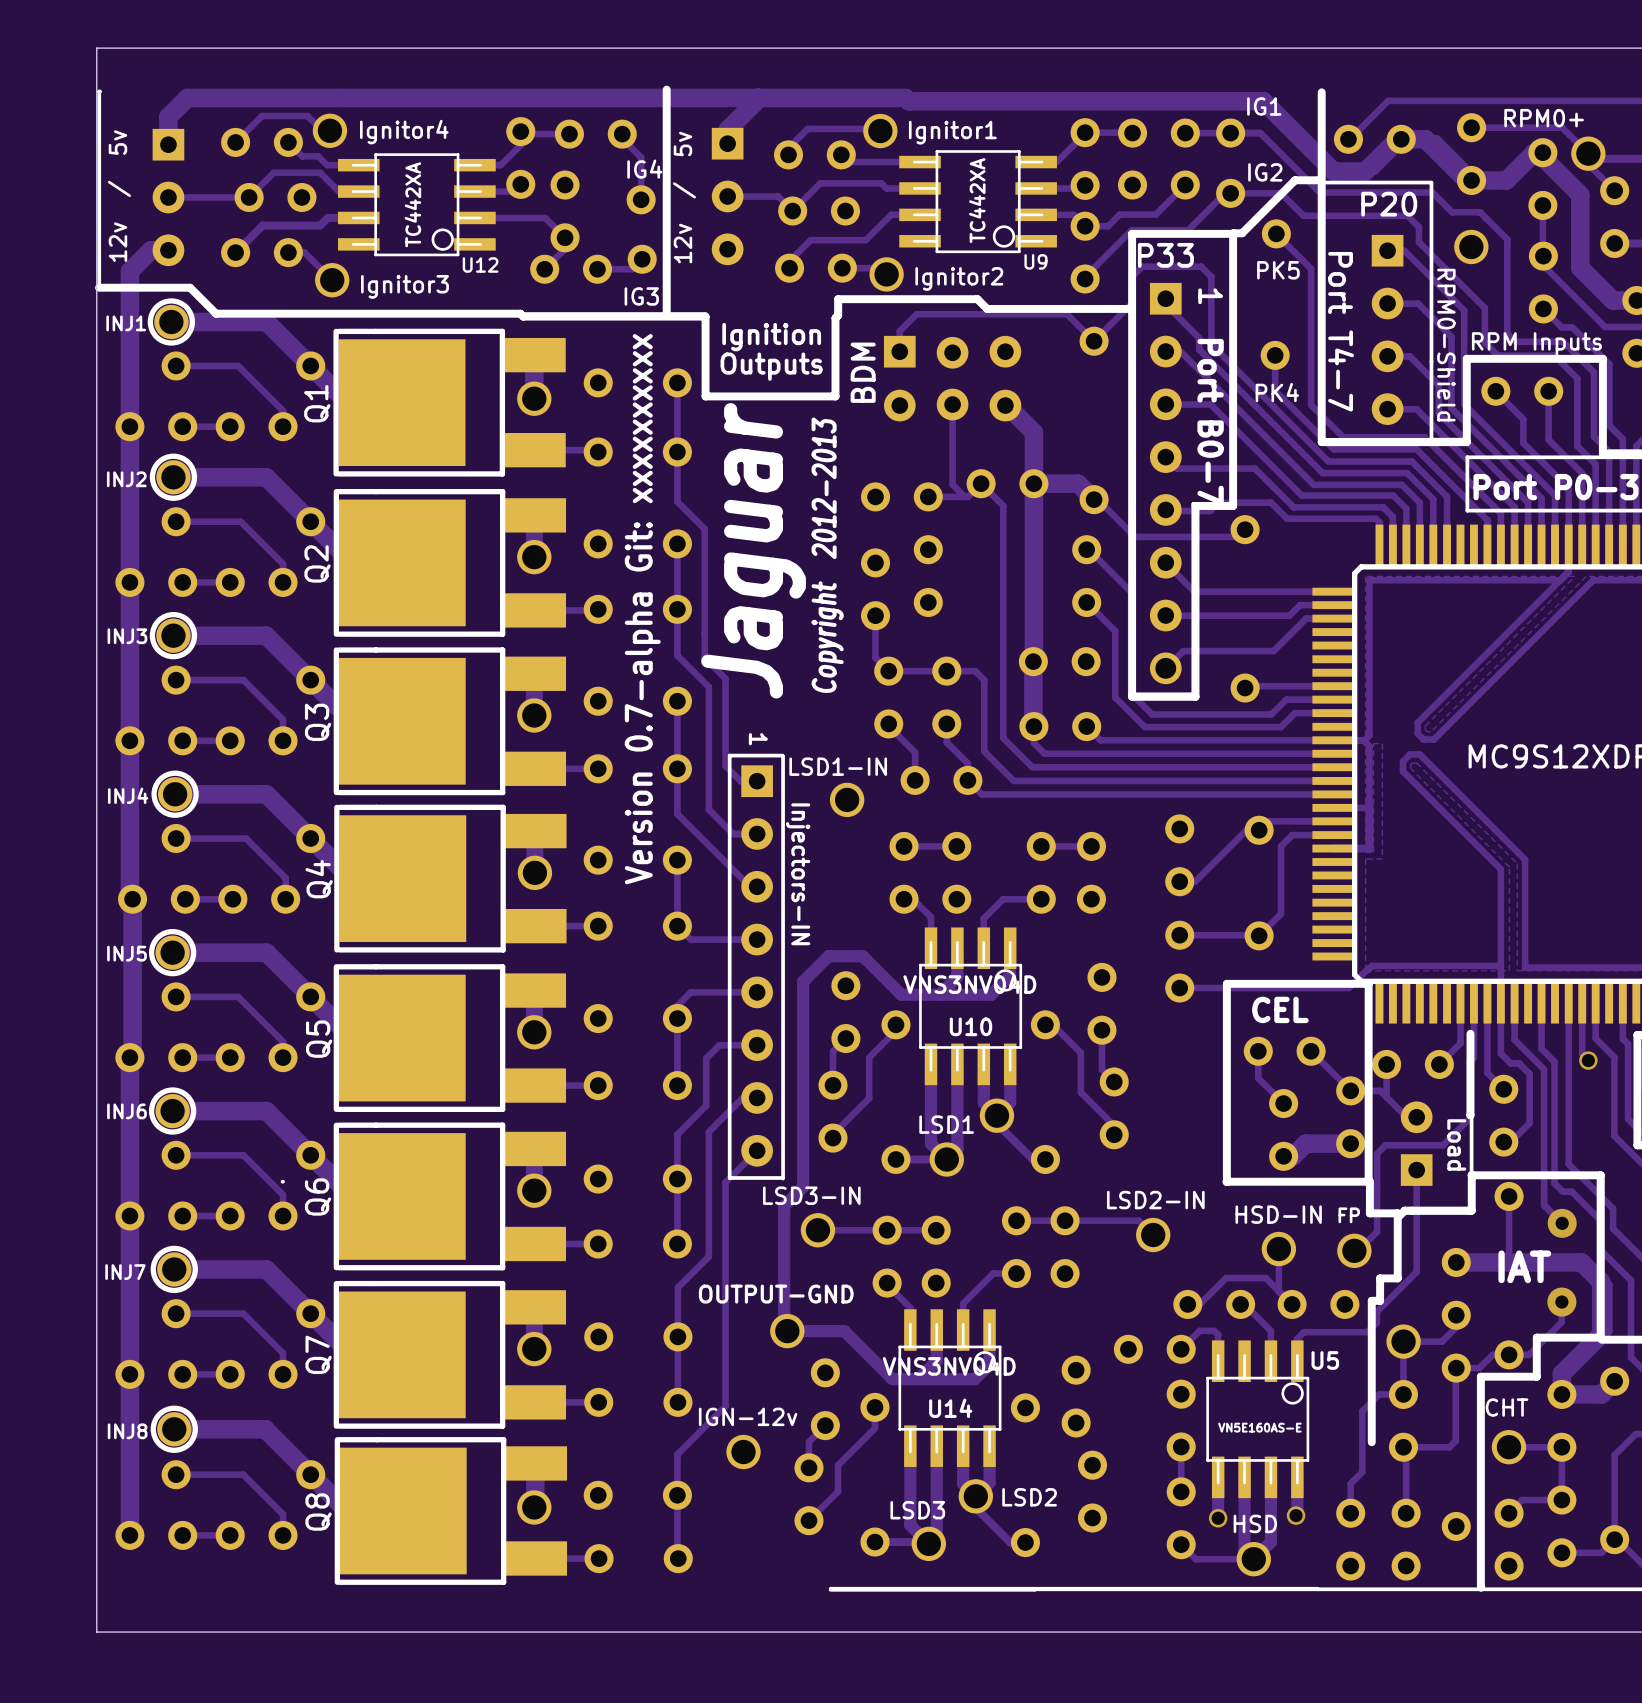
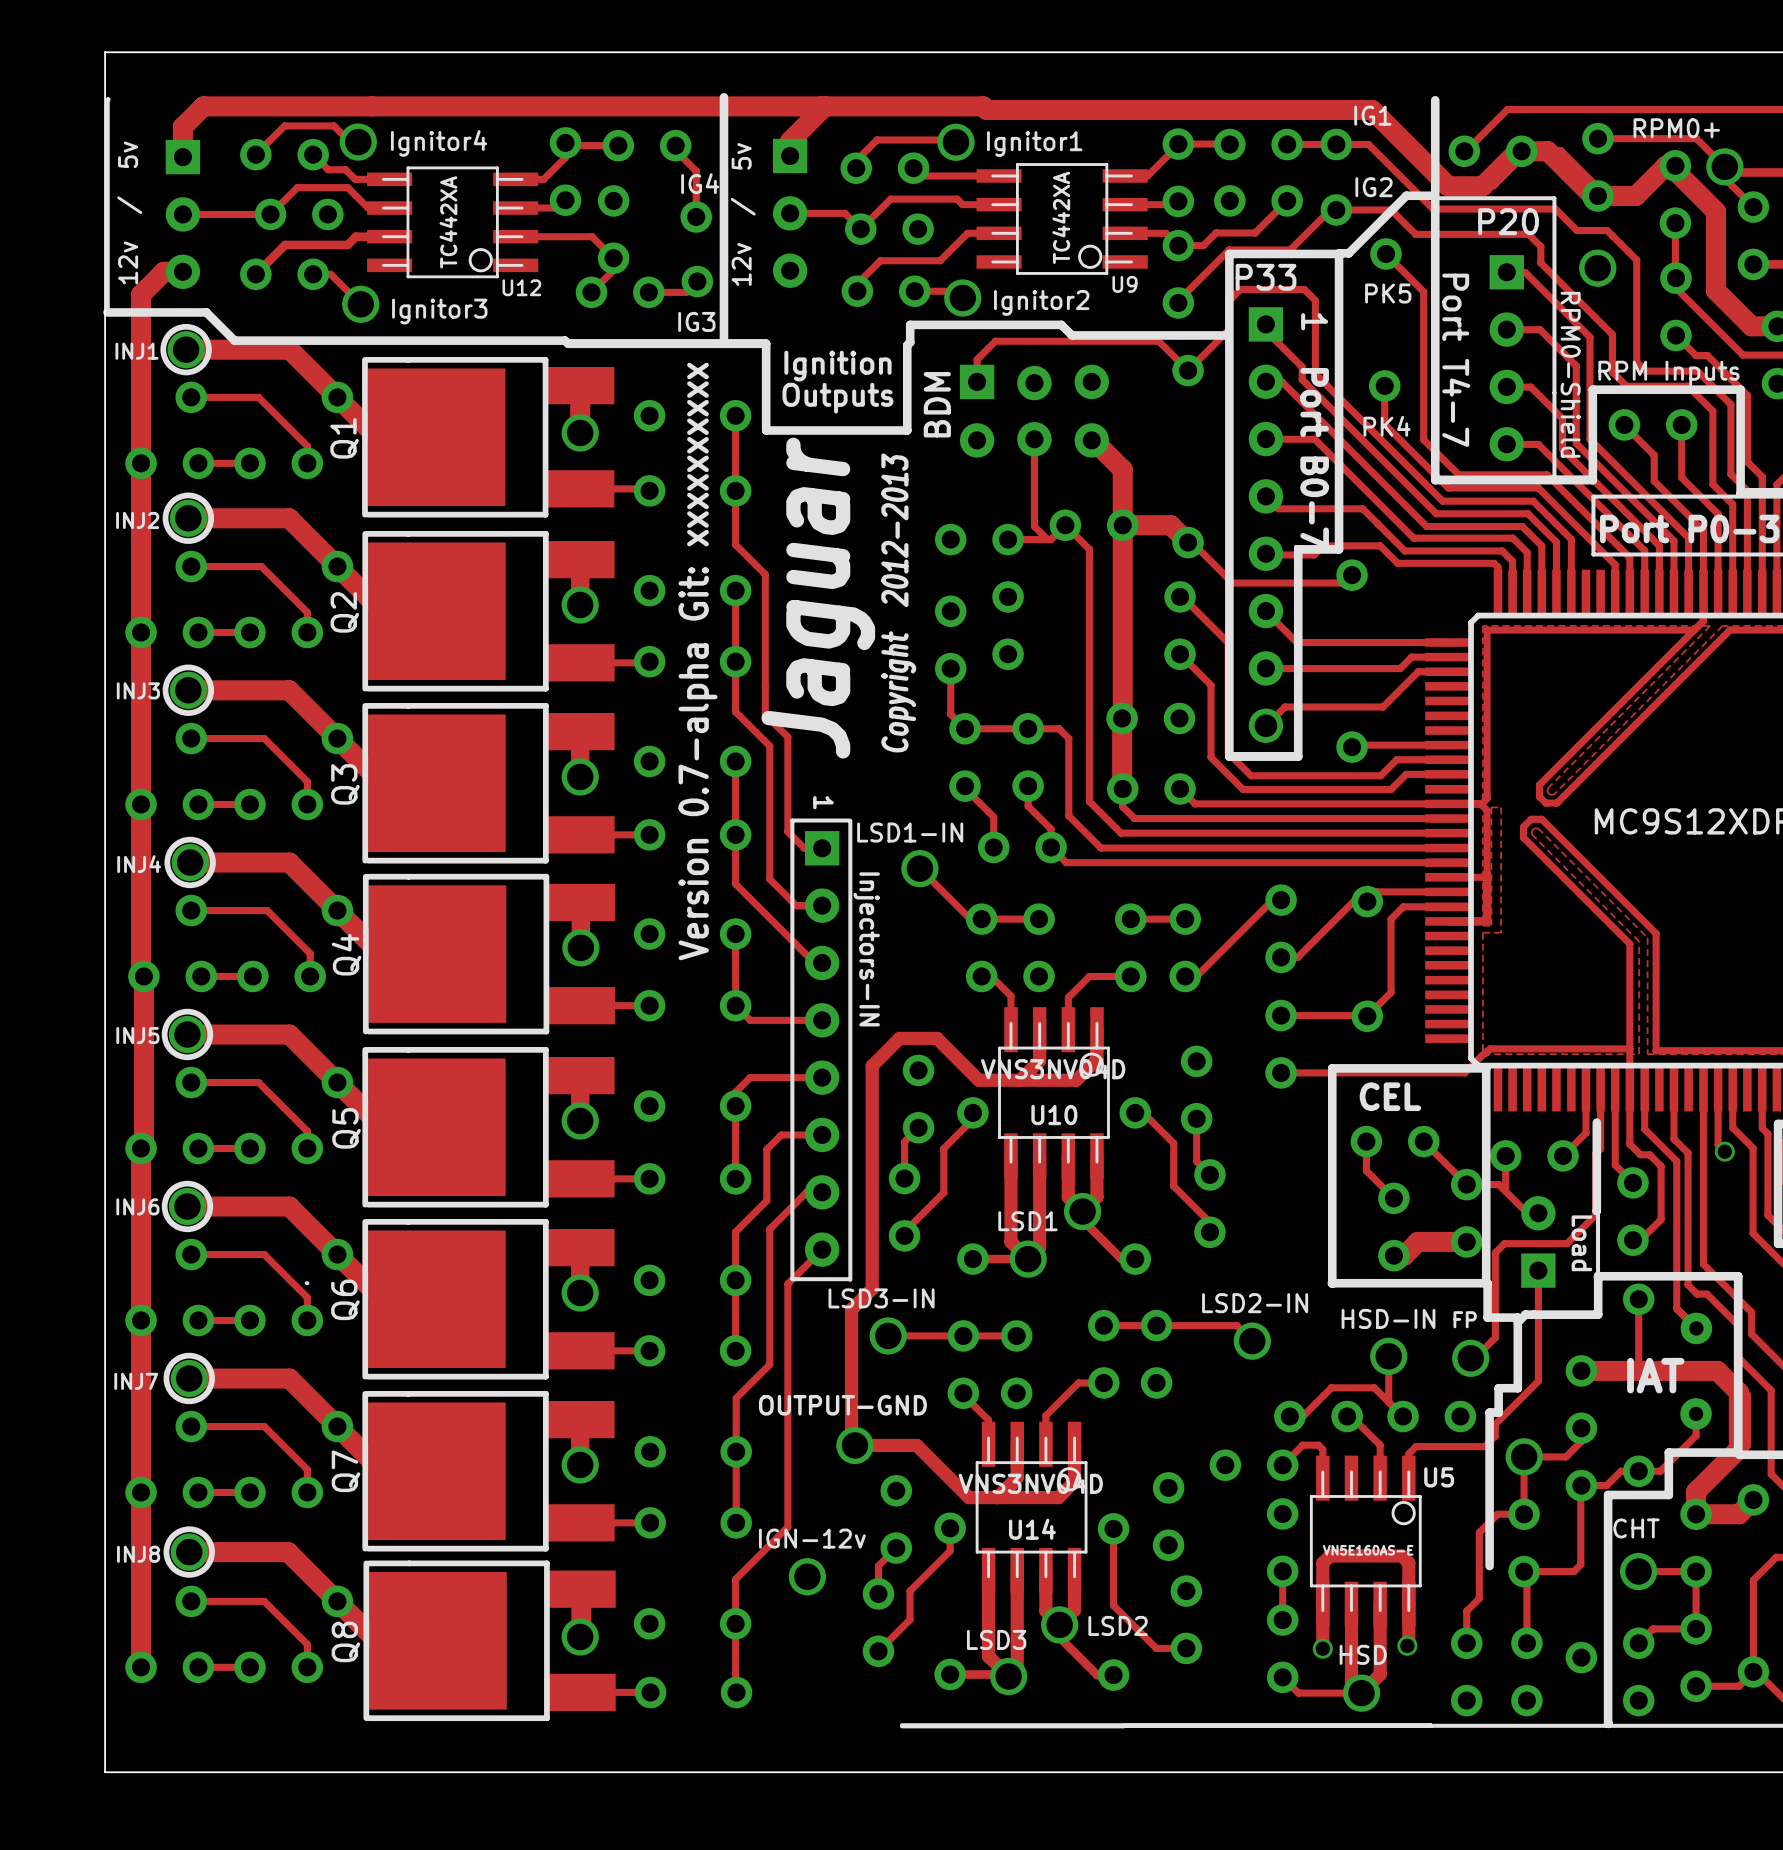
track: none -> (919, 868) (970, 919) (981, 919)
track: none -> (1281, 900) (1272, 900) (1196, 976) (1185, 976)
track: none -> (1113, 1528) (1113, 1605) (1156, 1648) (1186, 1648)
track: none -> (1322, 1604) (1322, 1563) (1330, 1555) (1401, 1555) (1408, 1562) (1408, 1604)

